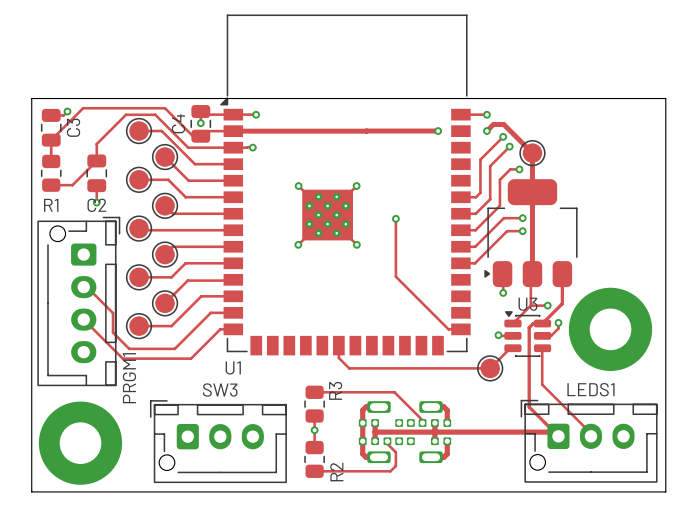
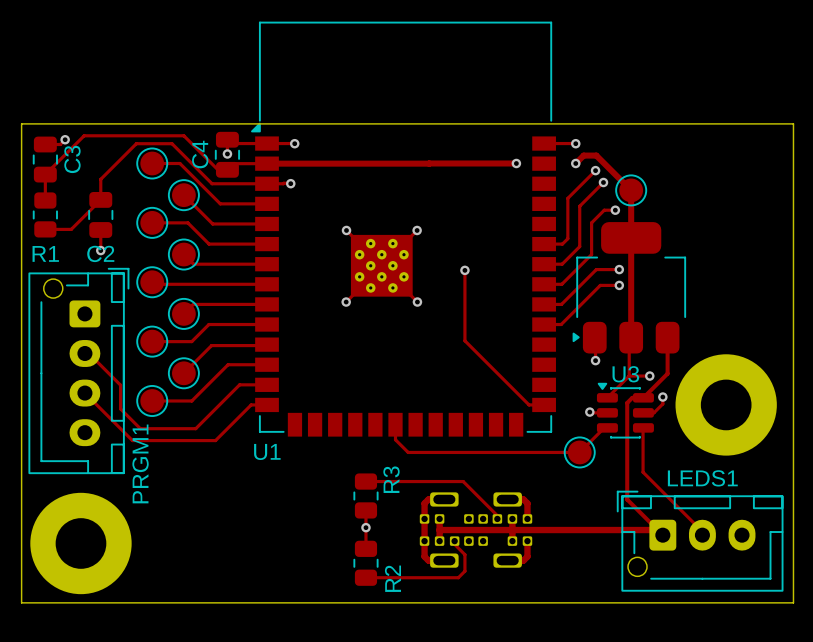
SW3: (218, 441) -> none

